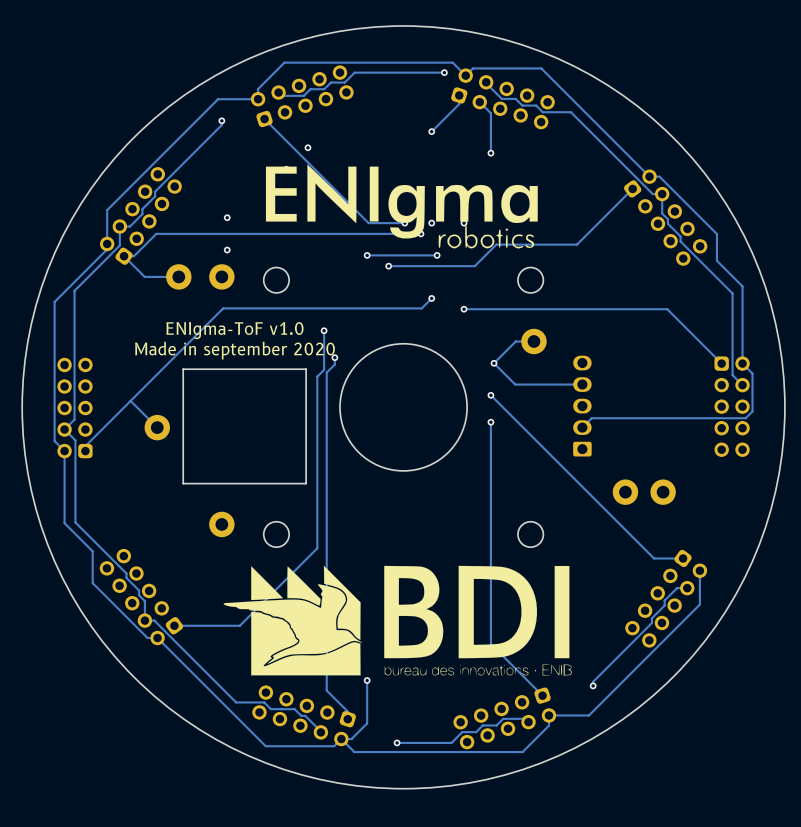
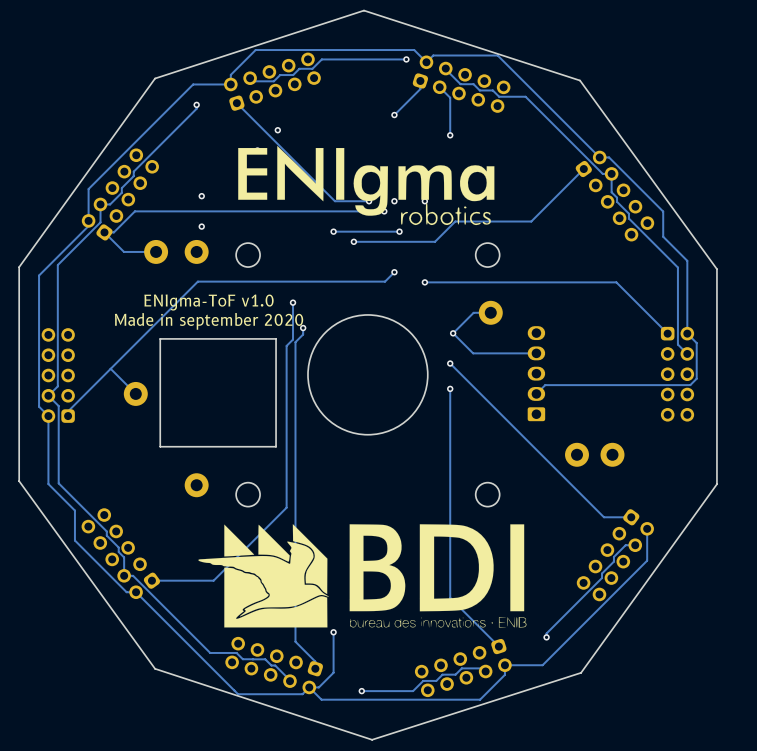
board edge: none -> (364, 10) (155, 78) (19, 267) (19, 481) (155, 668) (372, 739) (581, 672) (716, 484) (716, 269) (580, 80) (364, 10)
round board edge: [21, 25, 786, 789] -> none

